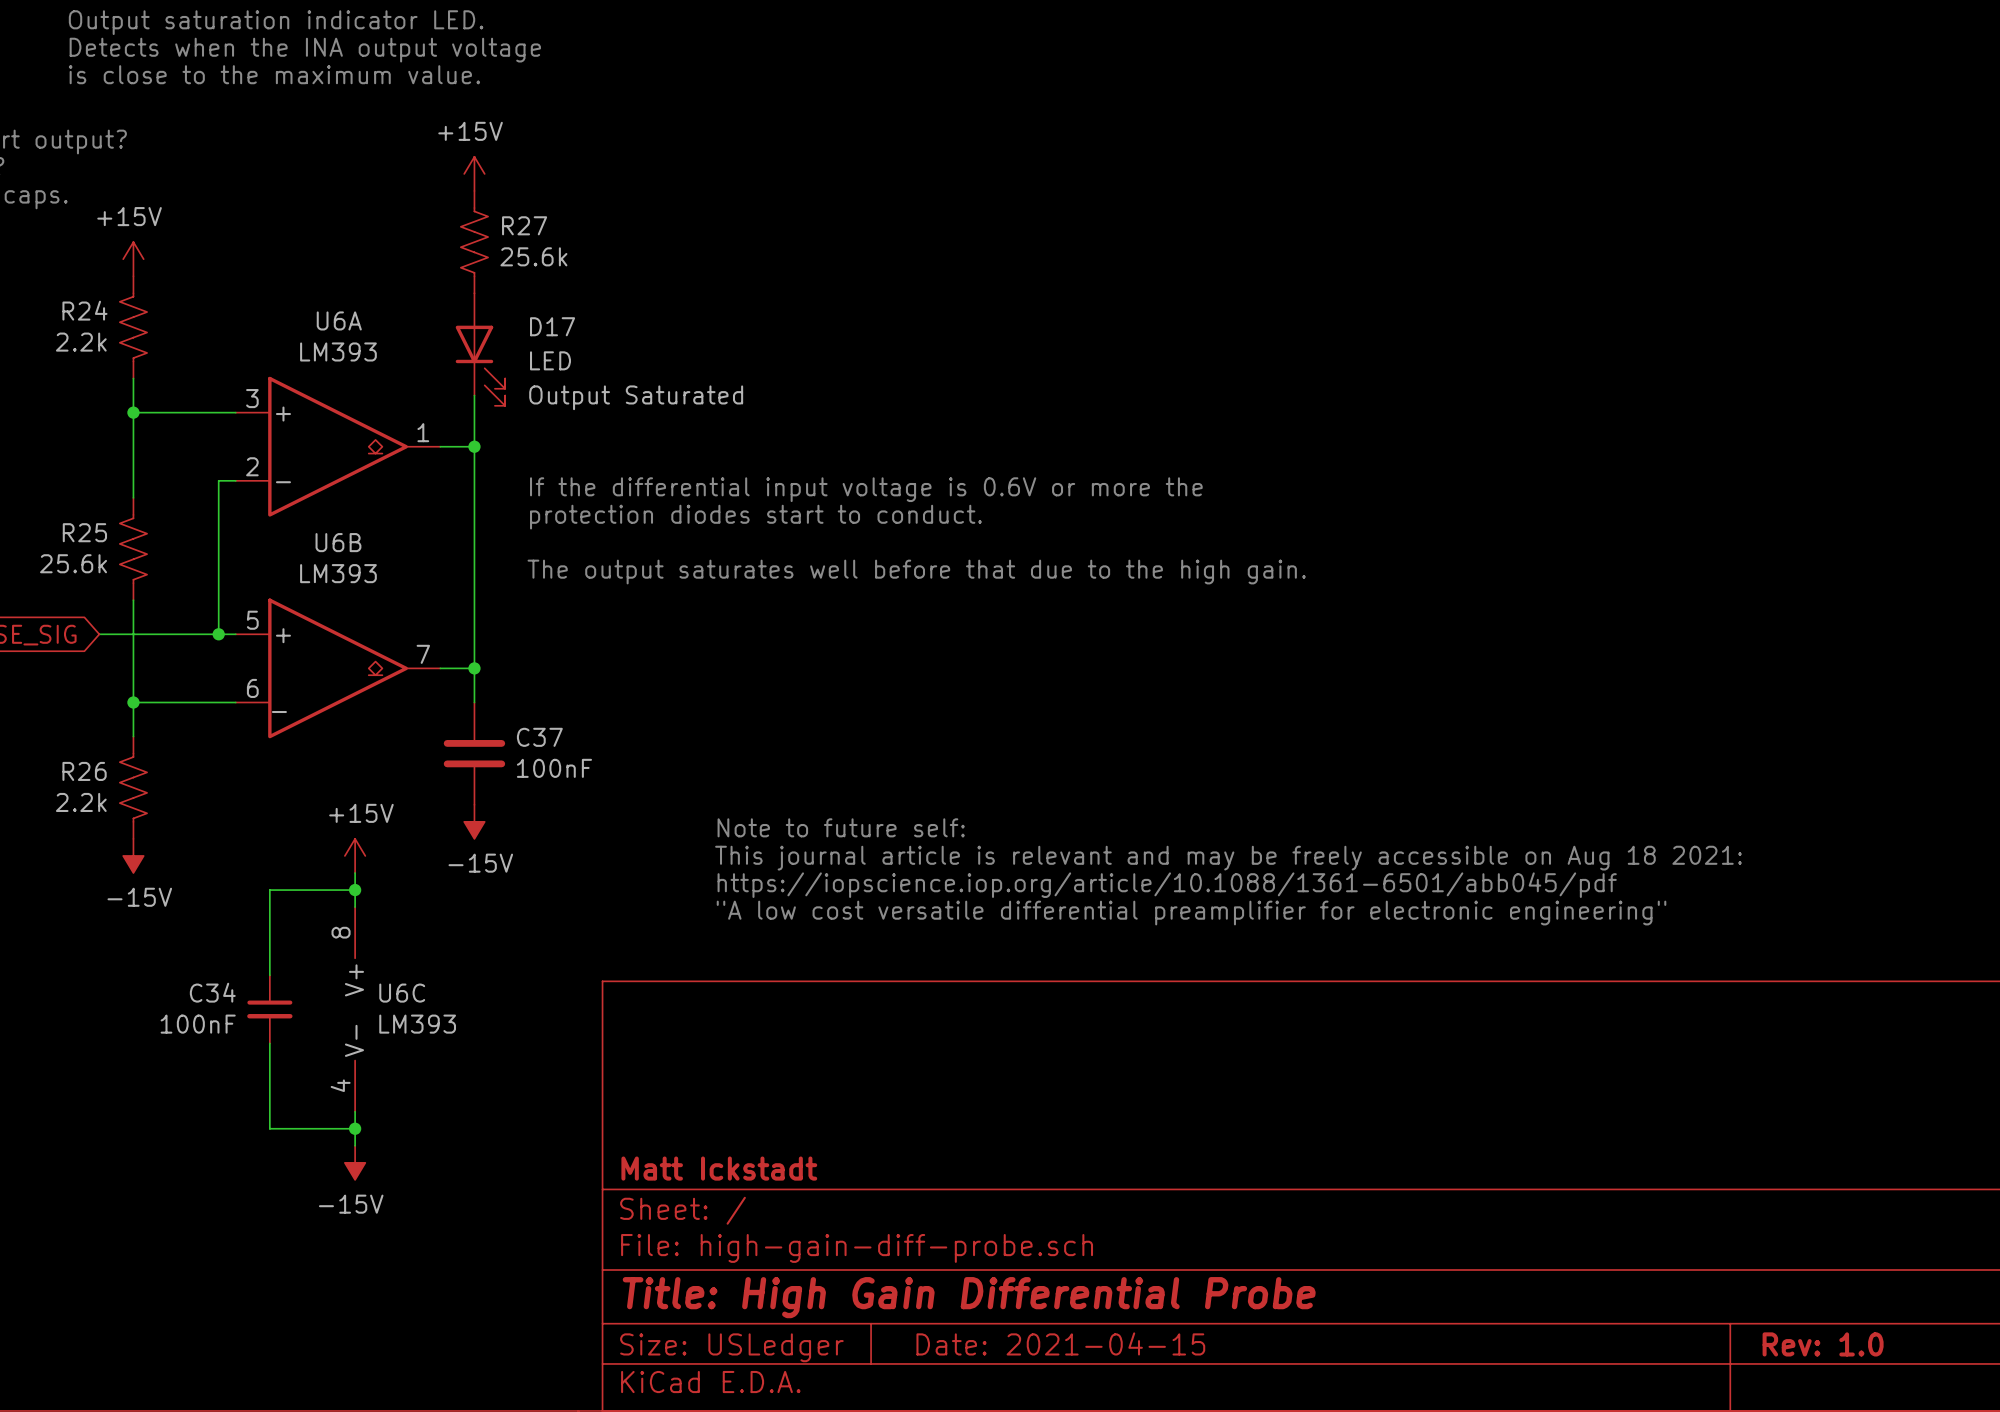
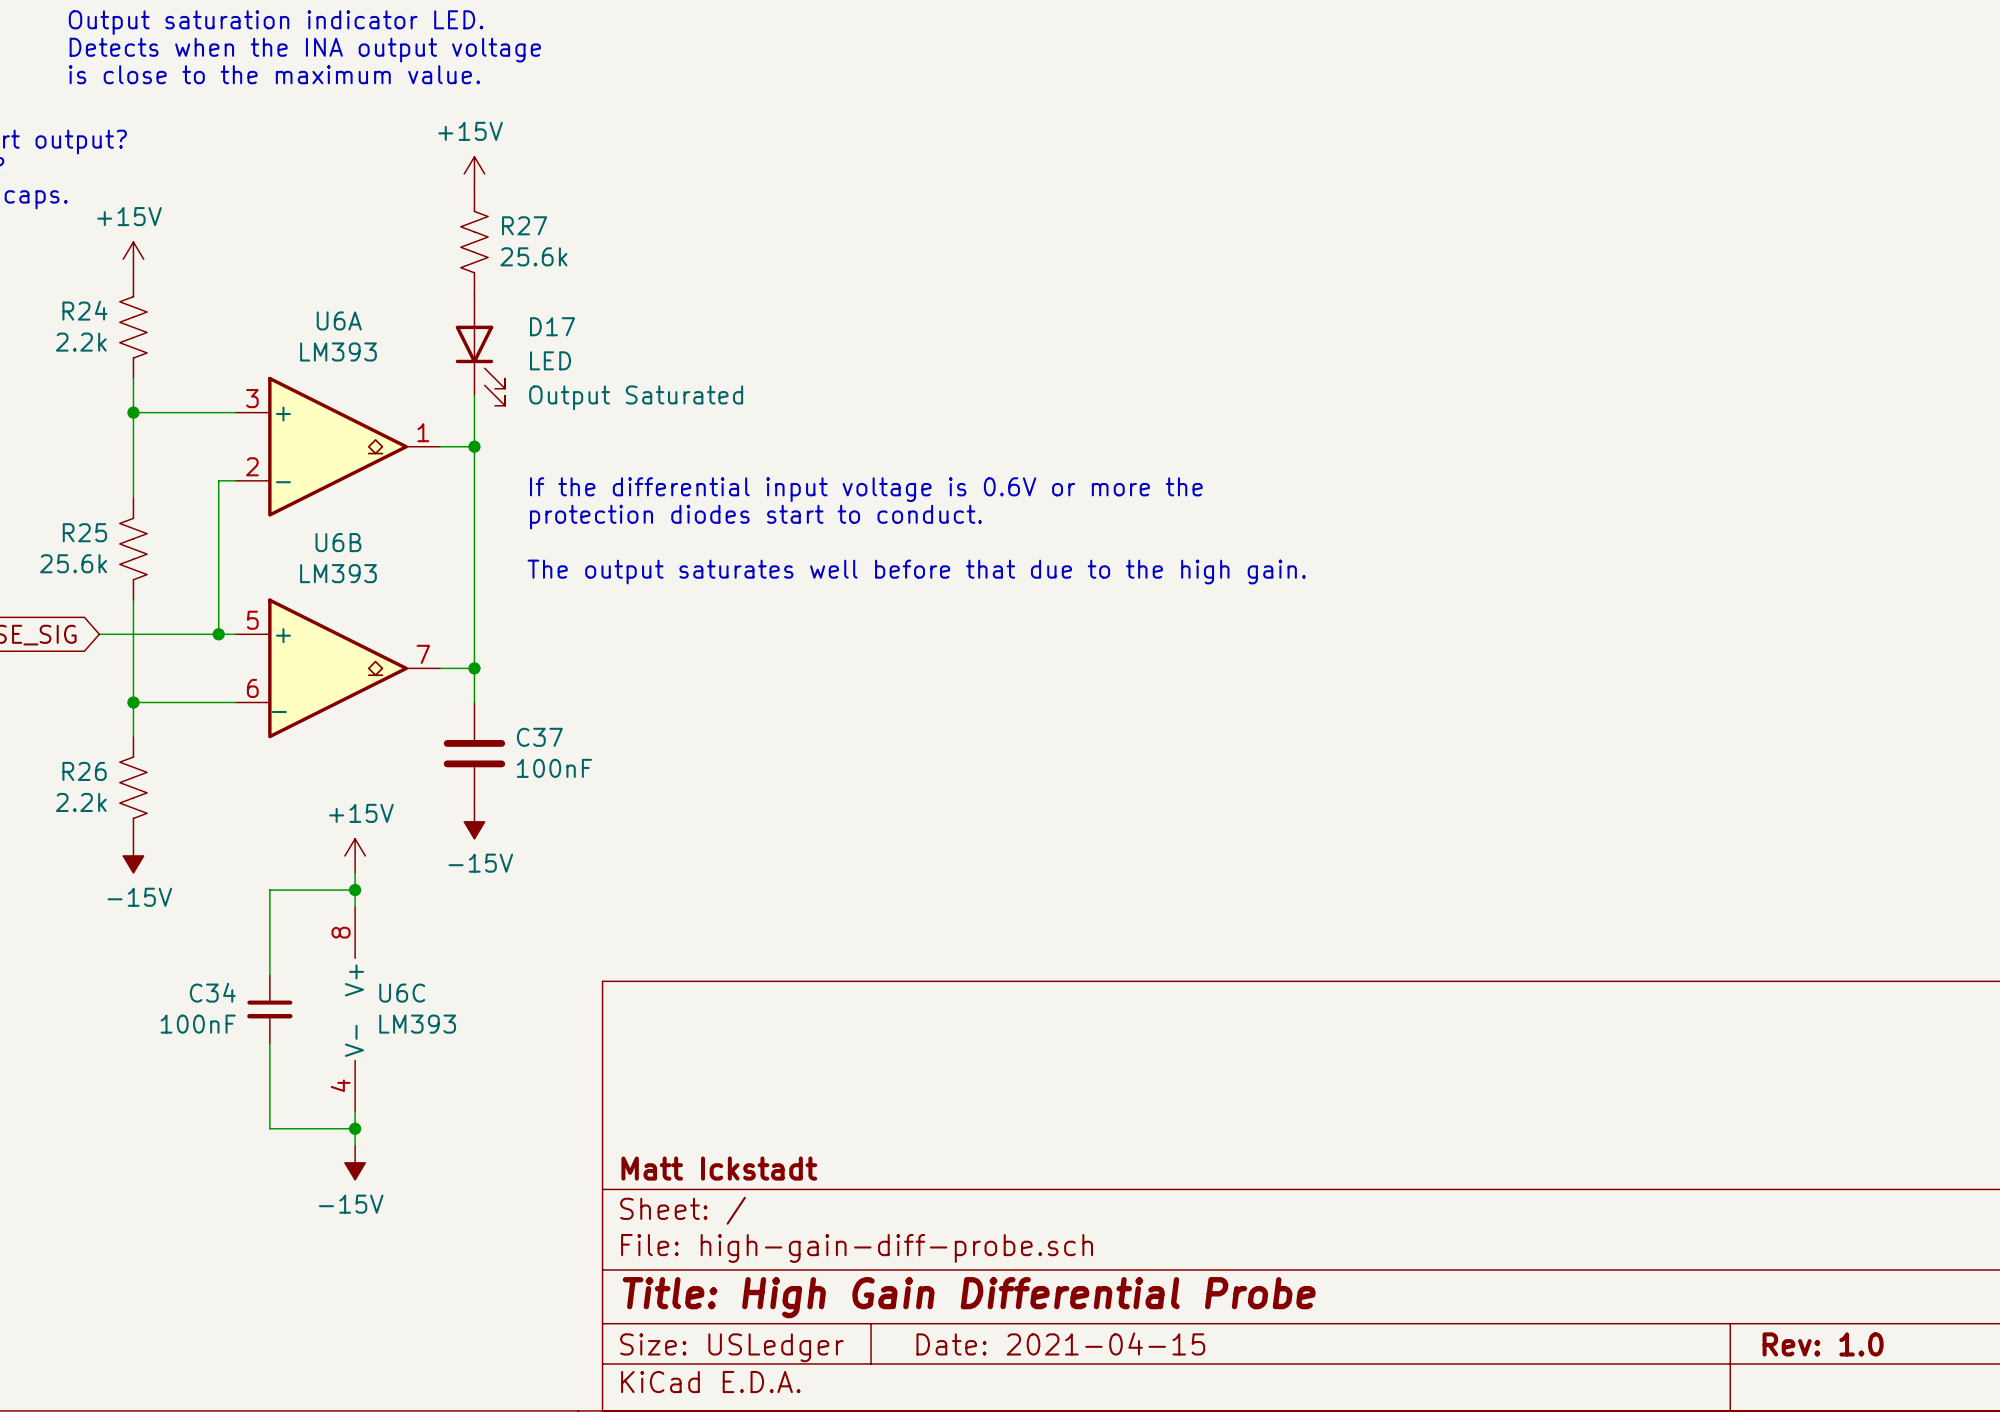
text: Note to future self: (841, 827) -> none
text: This journal article is relevant and may be freely accessible on Aug 18 2021: (1228, 858) -> none
text: https://iopscience.iop.org/article/10.1088/1361-6501/abb045/pdf (1167, 885) -> none
text: "A low cost versatile differential preamplifier for electronic engineering" (1191, 913) -> none

